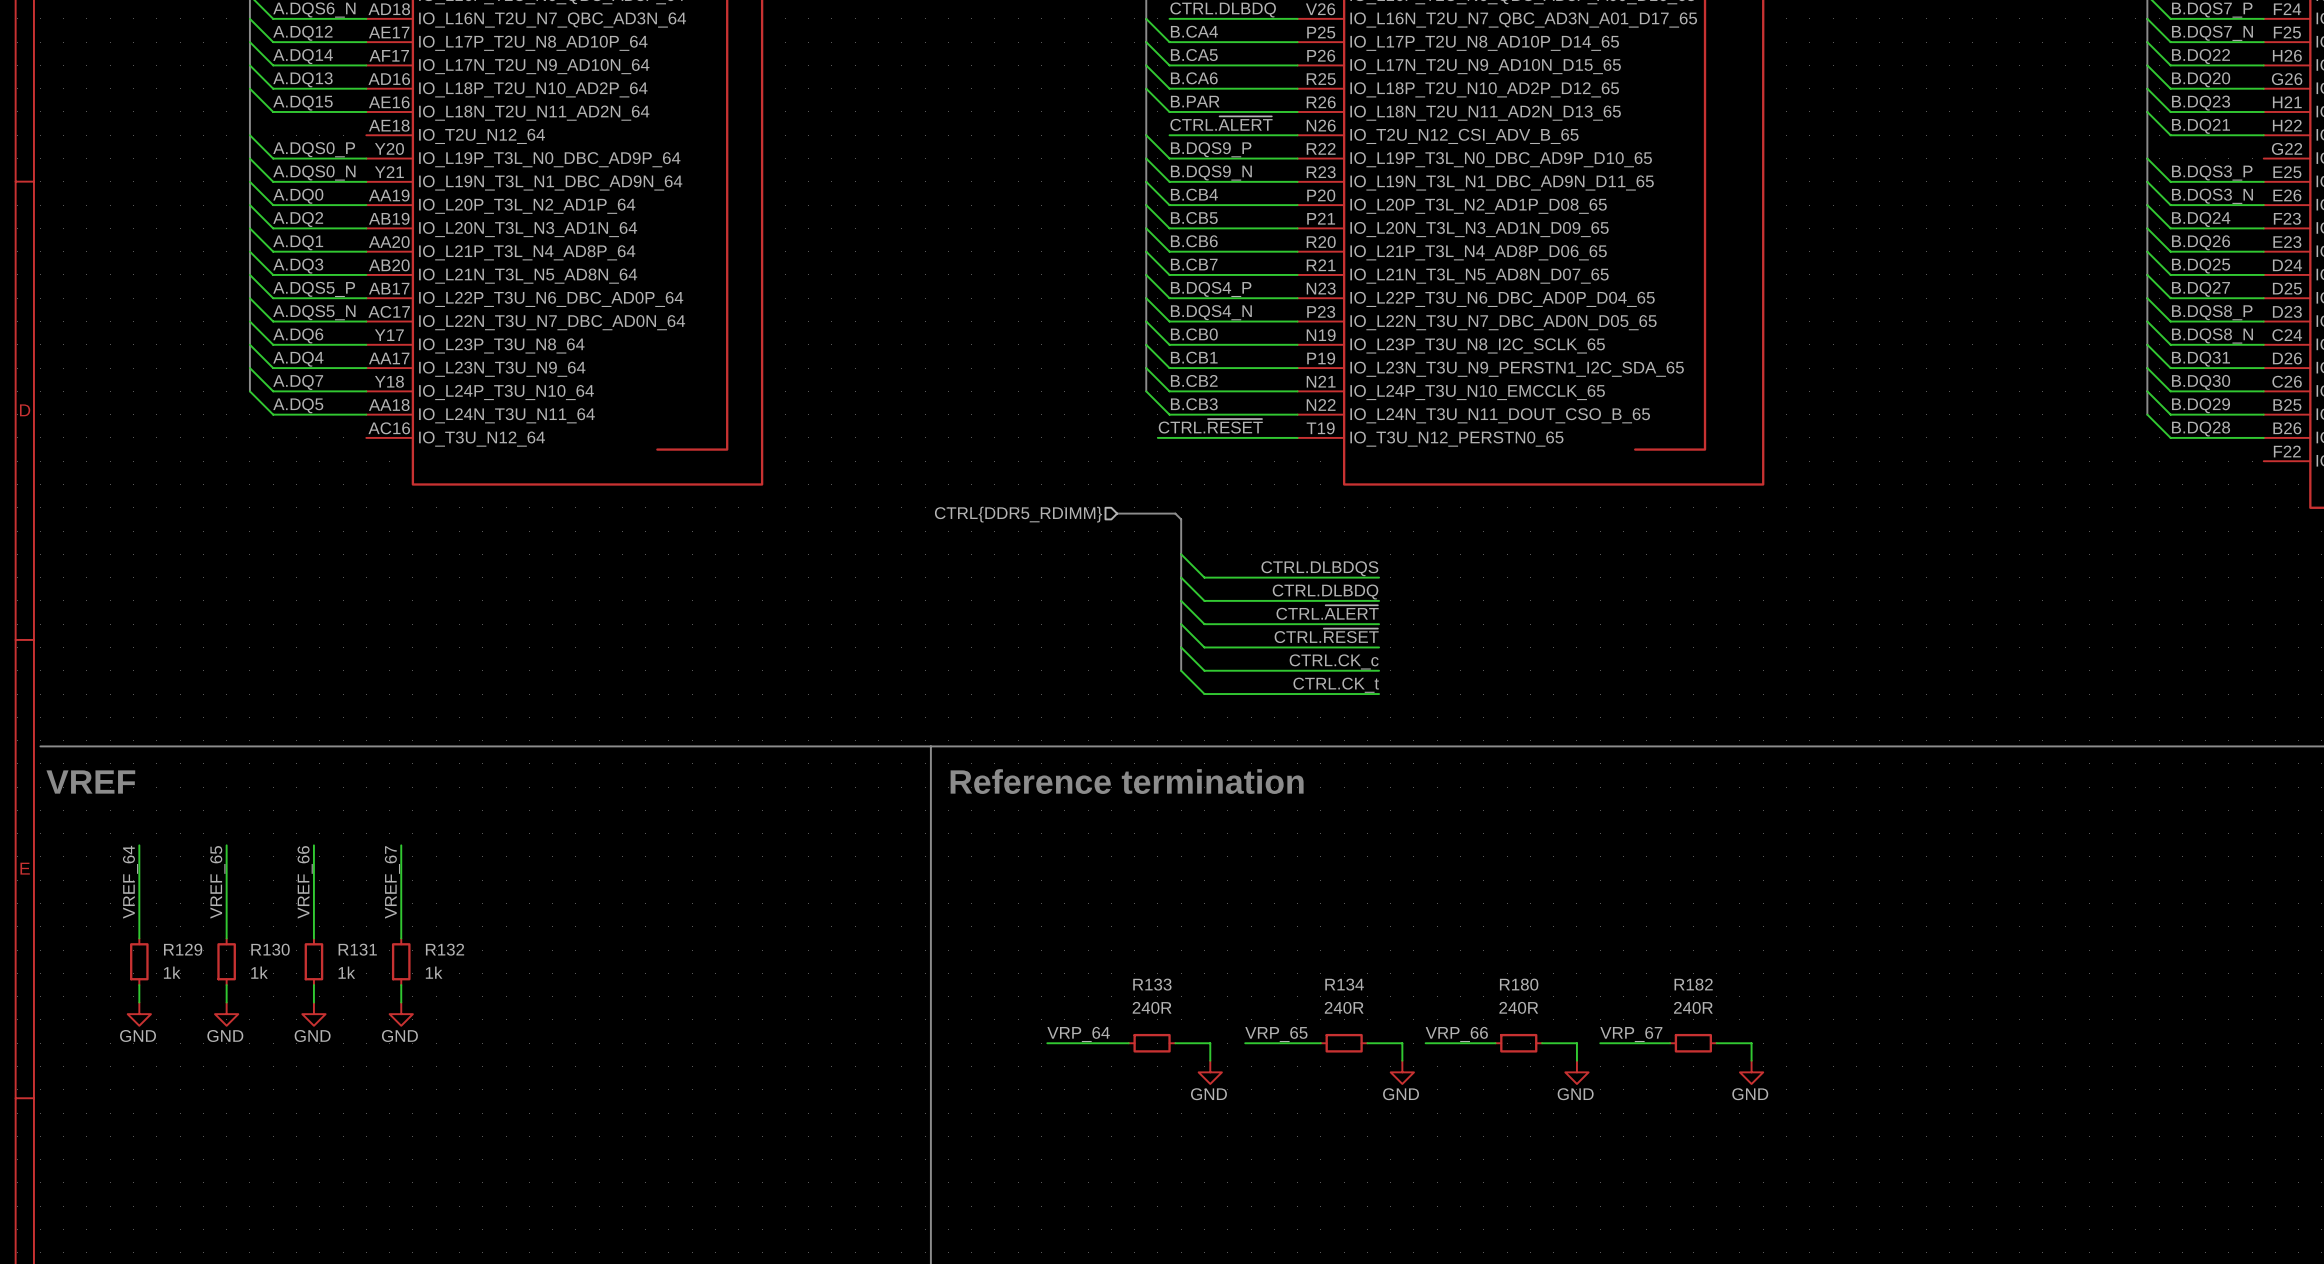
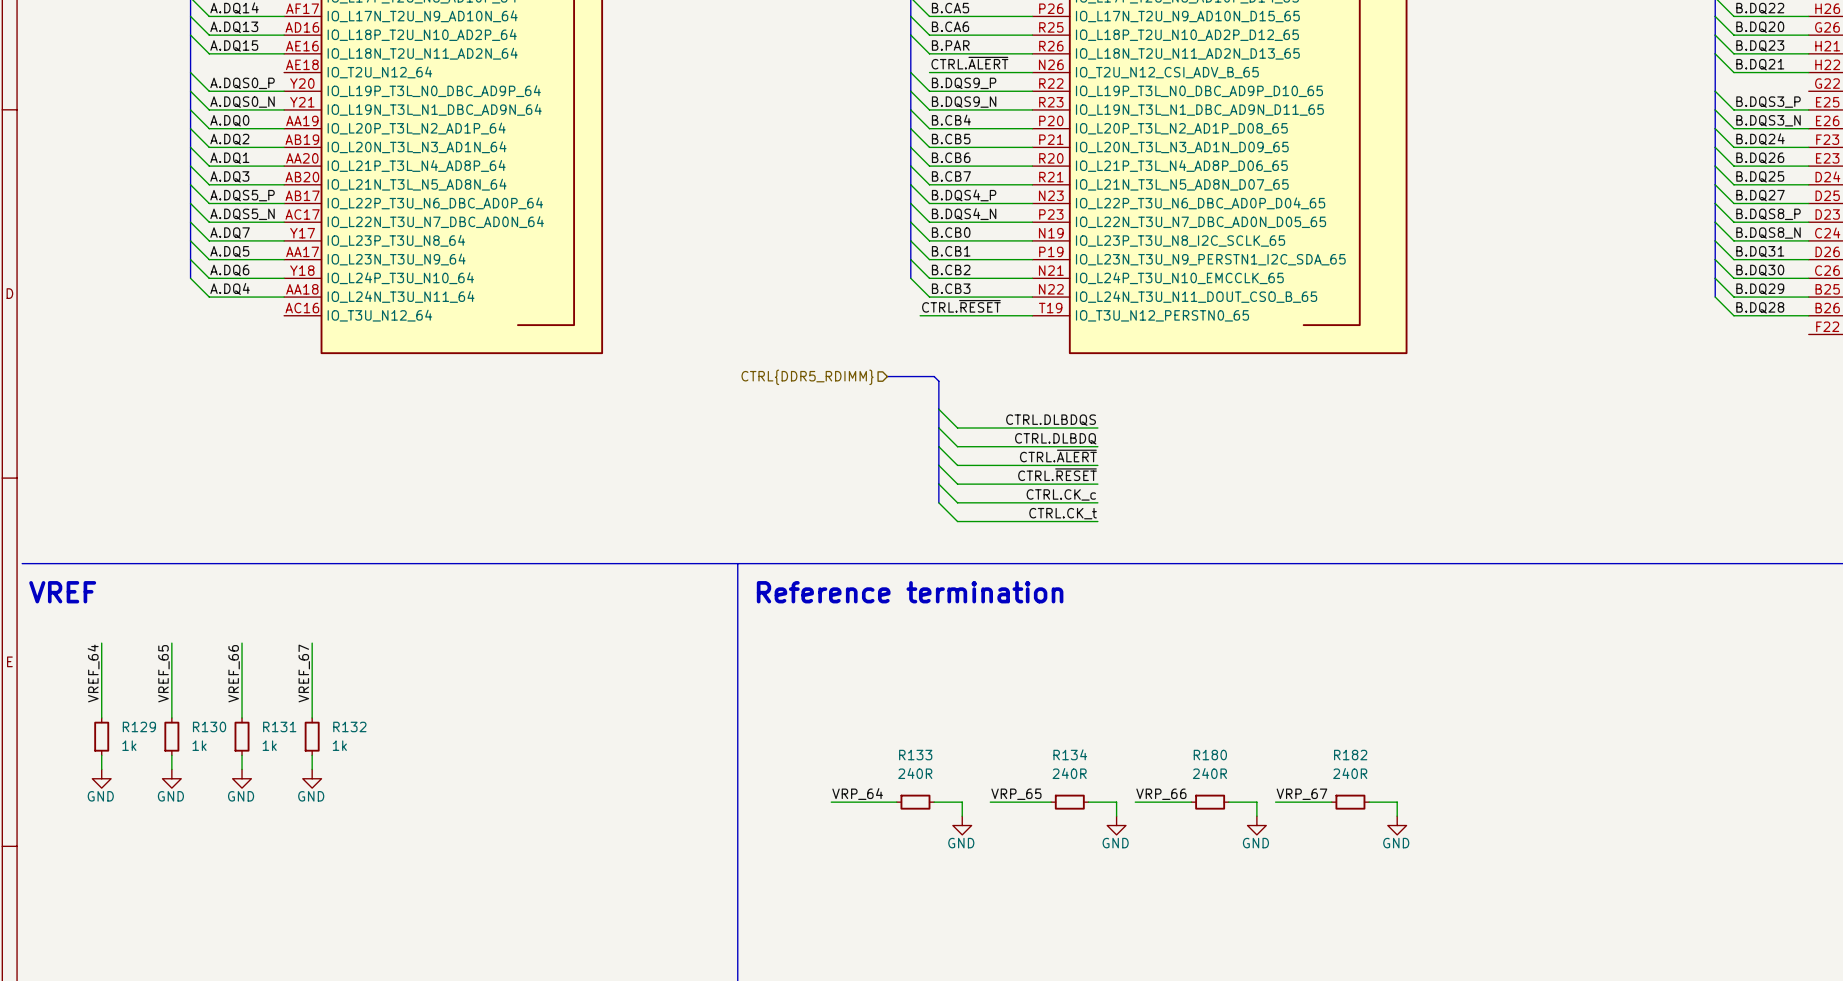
label: A.DQ6 (298, 335) -> A.DQ7 (230, 233)
label: A.DQ4 (298, 359) -> A.DQ5 (229, 251)
label: A.DQ7 (298, 382) -> A.DQ6 (229, 270)
label: A.DQ5 (298, 405) -> A.DQ4 (230, 288)

